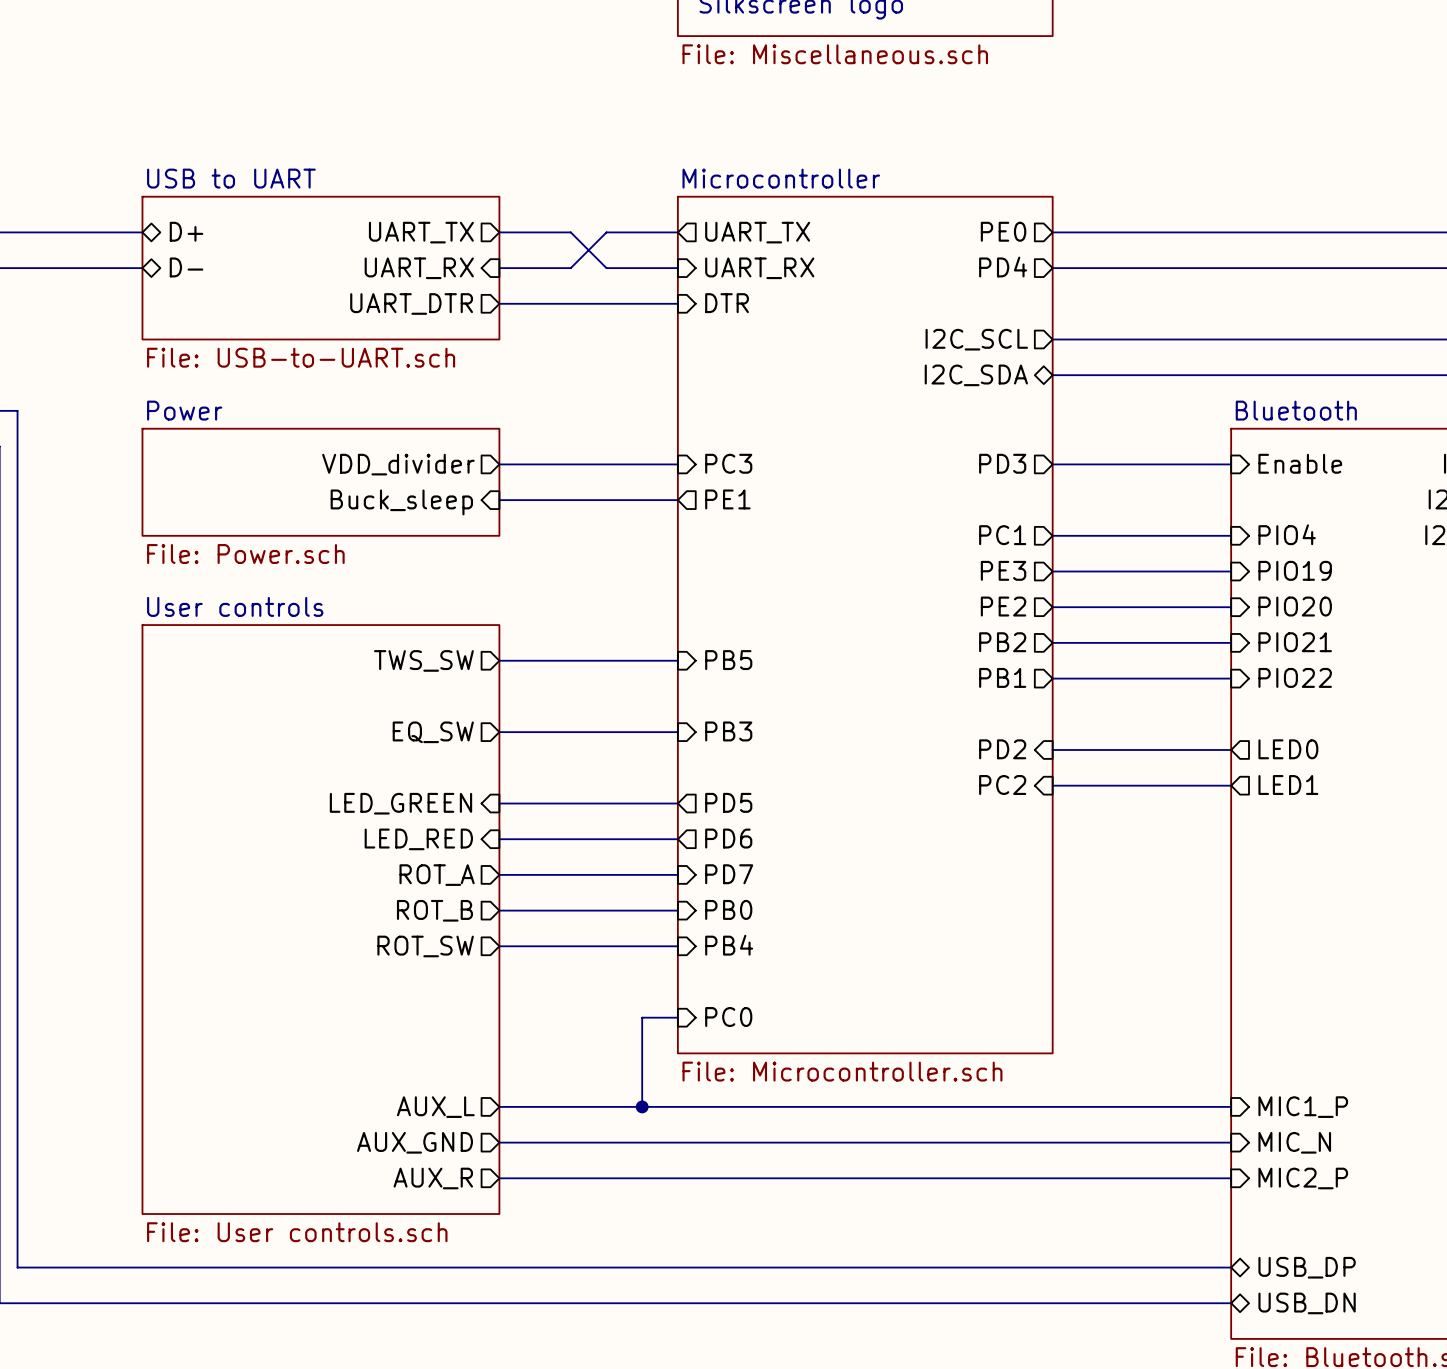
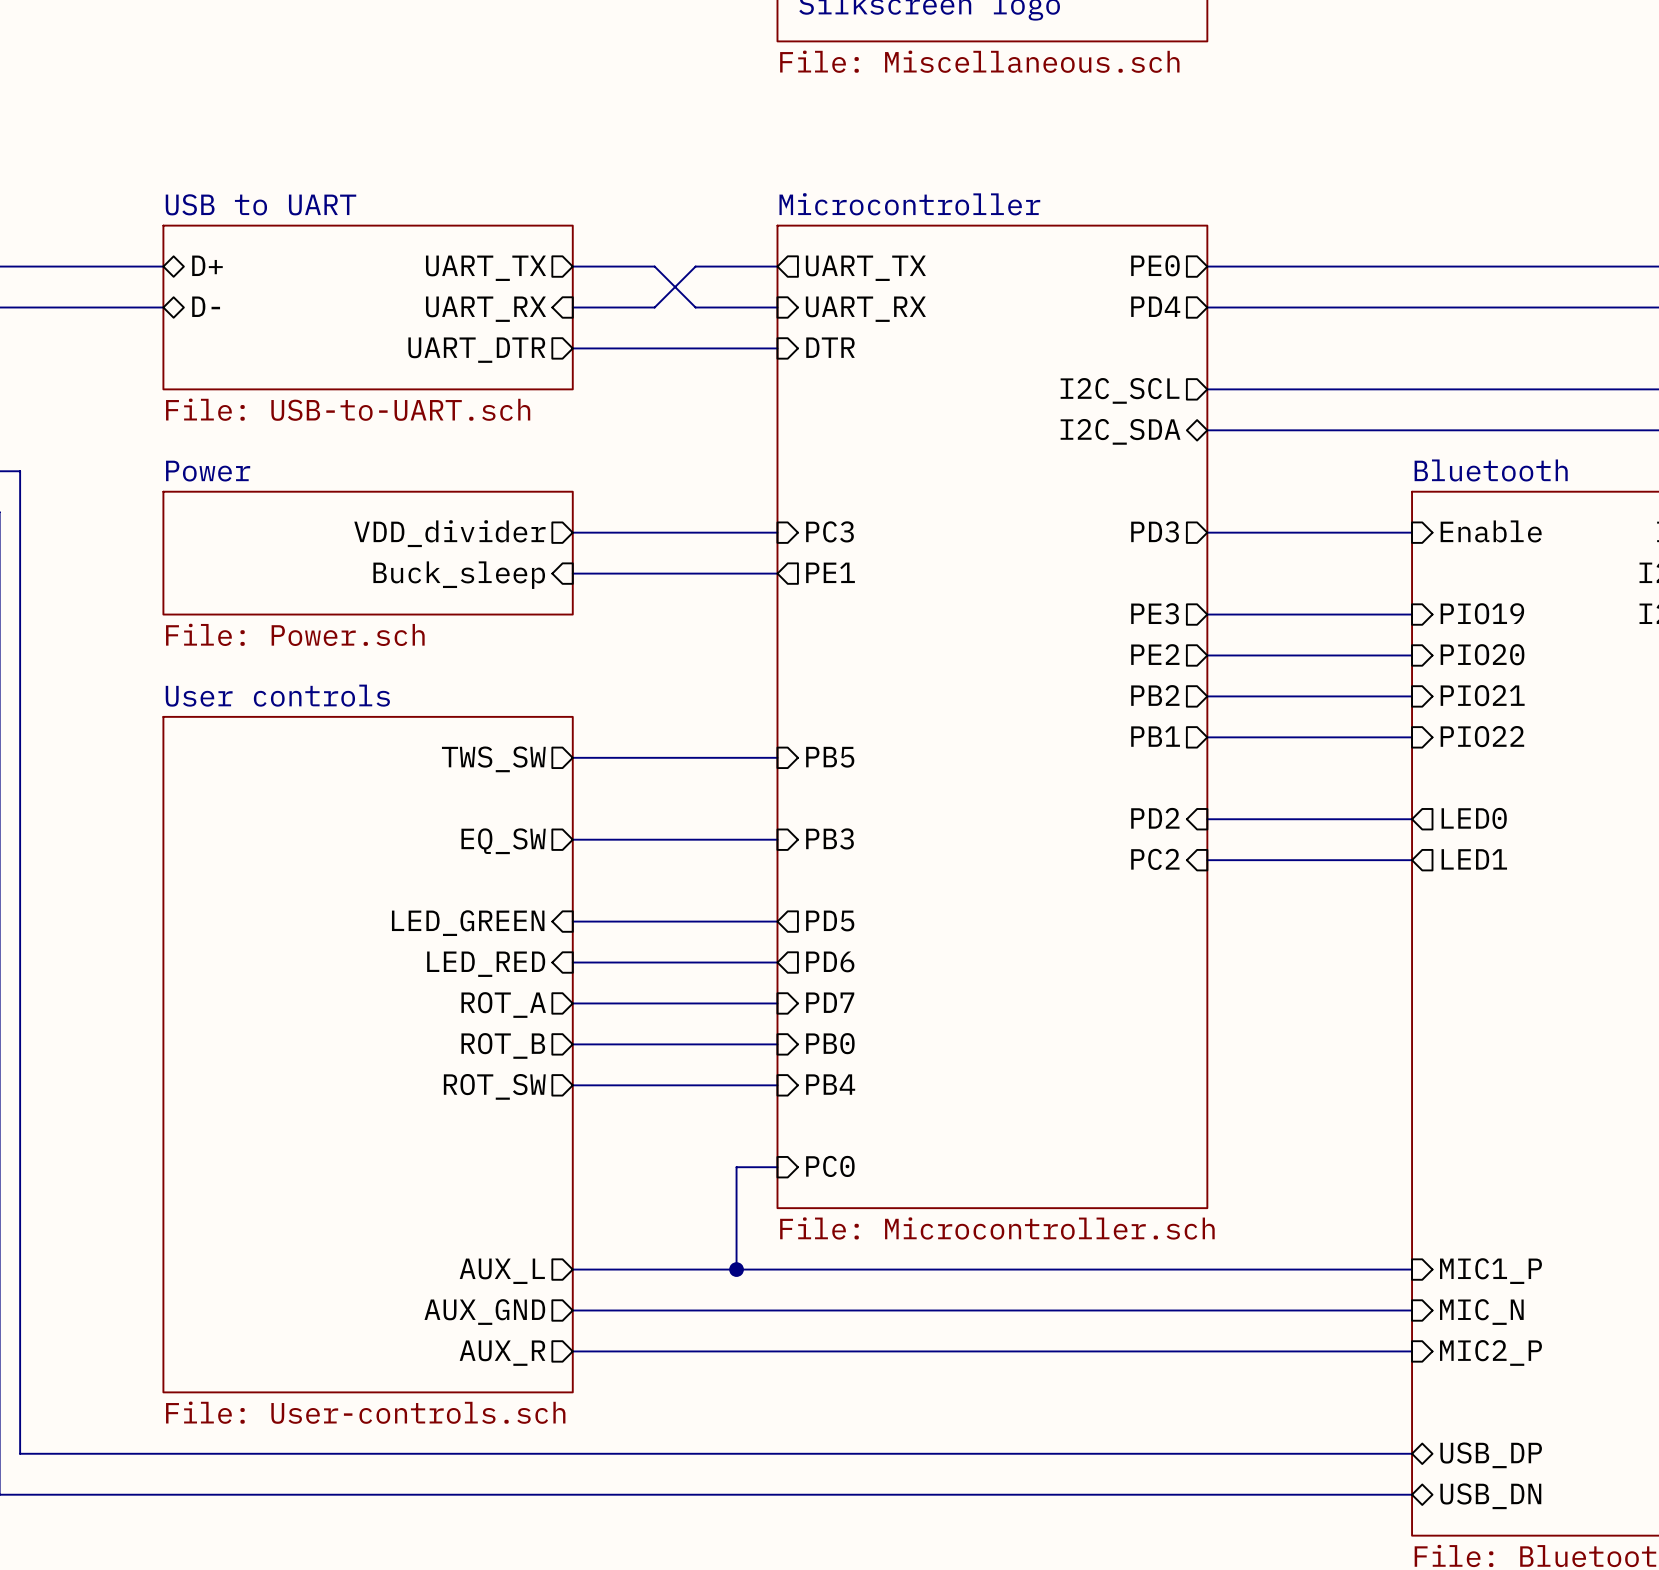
sheet pin: PIO4 (1287, 534) -> PIO19 (1482, 613)
sheet pin: PC1 (1002, 535) -> PE3 (1155, 613)
sheet pin: PE3 (1003, 570) -> PE2 (1155, 654)
sheet pin: PIO19 (1295, 570) -> PIO20 (1482, 654)
sheet pin: PE2 (1003, 606) -> PB2 (1155, 695)
sheet pin: PIO20 (1295, 606) -> PIO21 (1482, 695)
sheet pin: PB2 (1002, 642) -> PB1 (1155, 736)
sheet pin: PIO21 (1295, 642) -> PIO22 (1482, 736)
sheet pin: PB1 (1002, 677) -> none
sheet pin: PIO22 (1295, 677) -> none
wire: (1052, 678) (1231, 678) -> (1207, 819) (1412, 819)
sheet pin: none -> PD2 (1155, 818)
sheet pin: none -> LED0 (1474, 818)
sheet pin: PD2 (1002, 749) -> PC2 (1155, 859)
sheet pin: LED0 (1288, 749) -> LED1 (1474, 859)
sheet pin: PC2 (1002, 785) -> none
wire: (1052, 785) (1231, 785) -> none
sheet pin: LED1 (1288, 785) -> none
sheet User controls value: File: User controls.sch (297, 1232) -> File: User-controls.sch (365, 1412)

